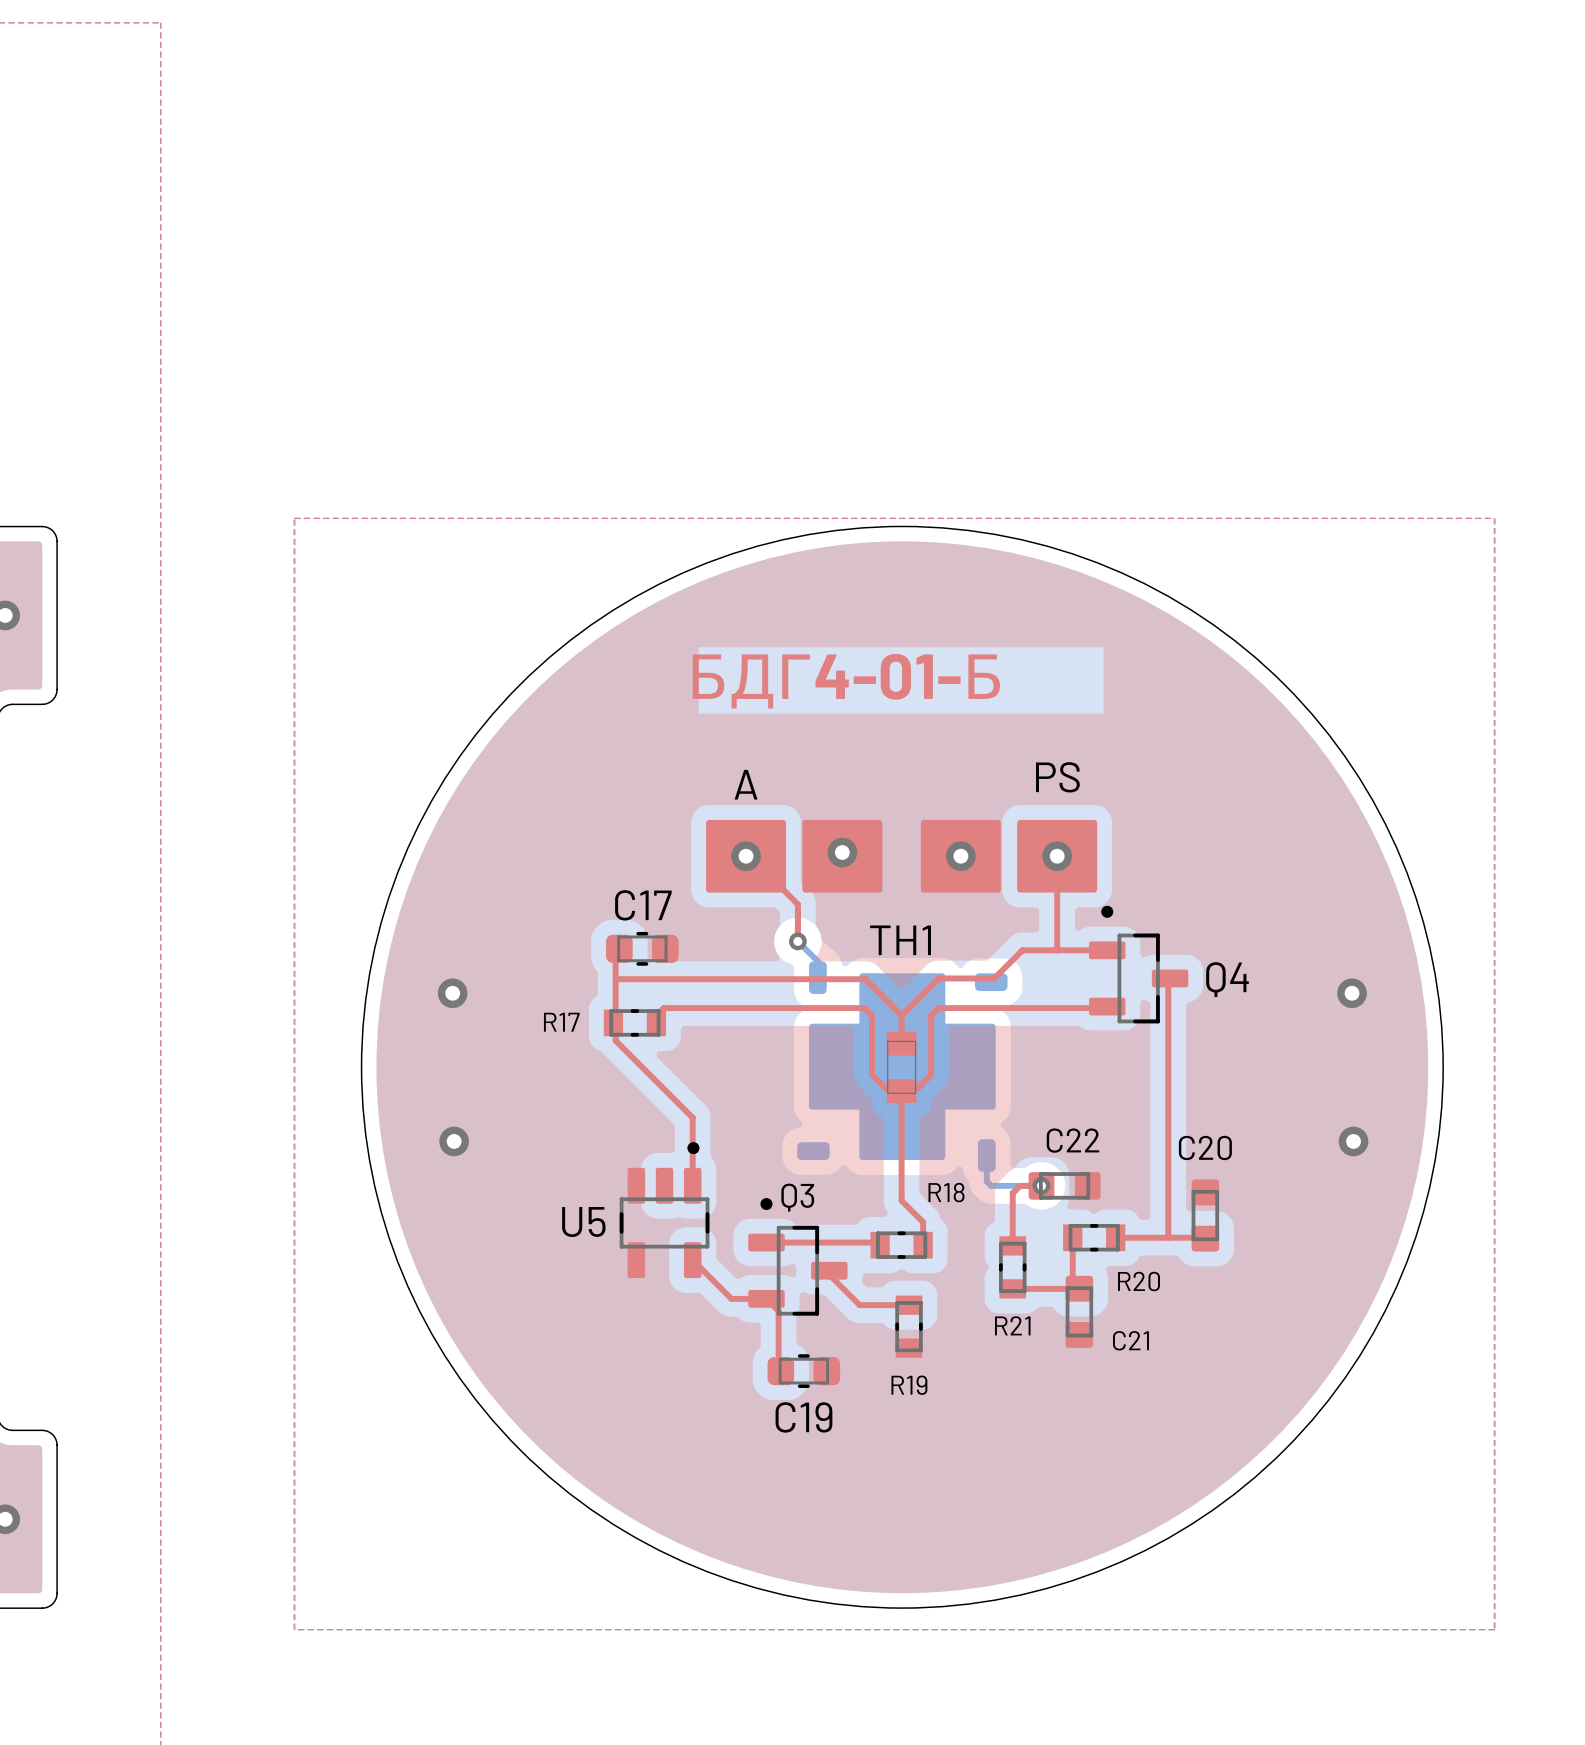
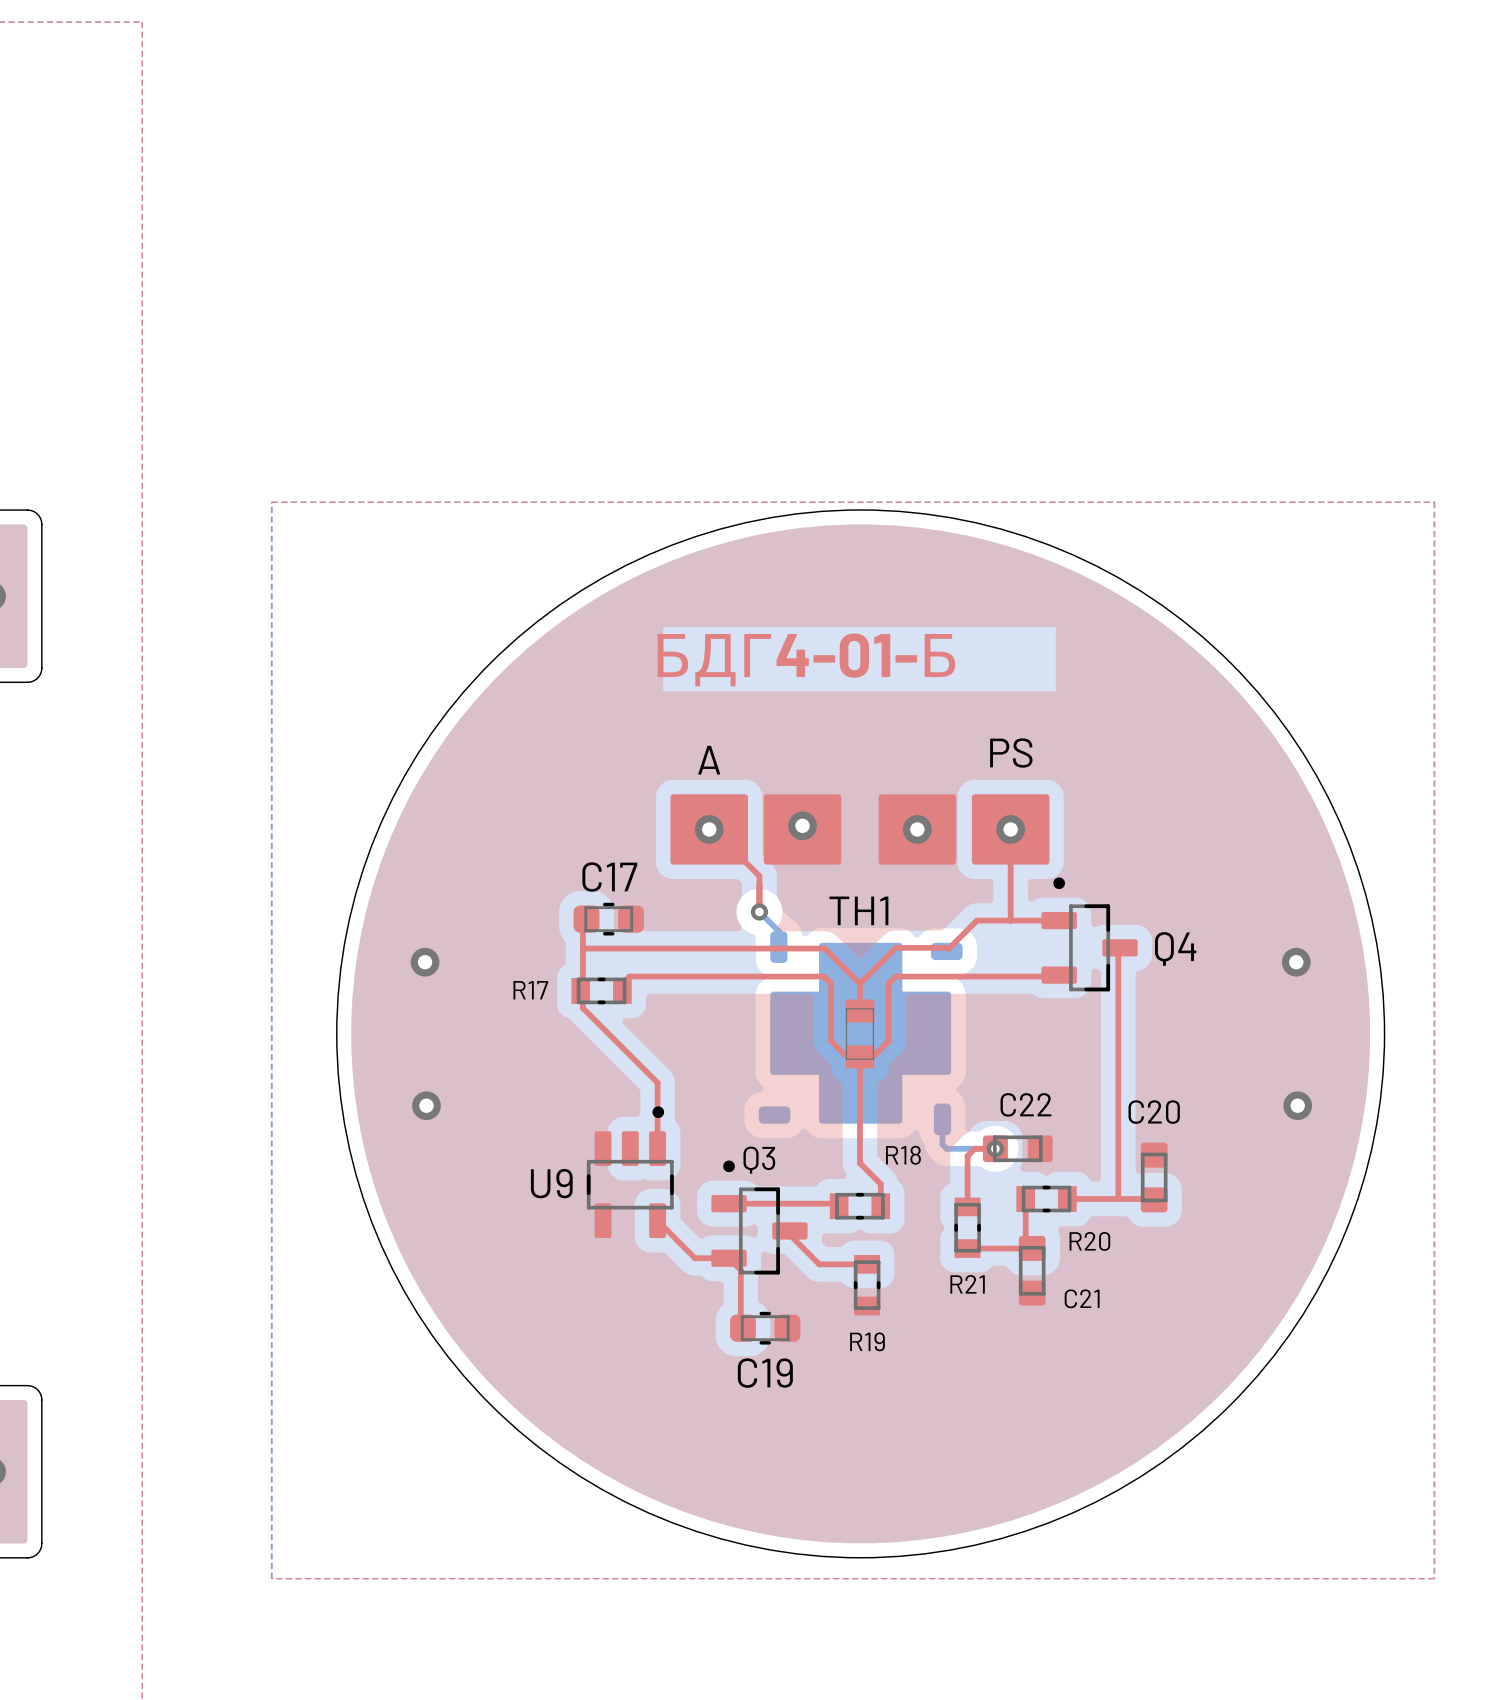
U5 name: U5 (583, 1222) -> U9 (551, 1183)

